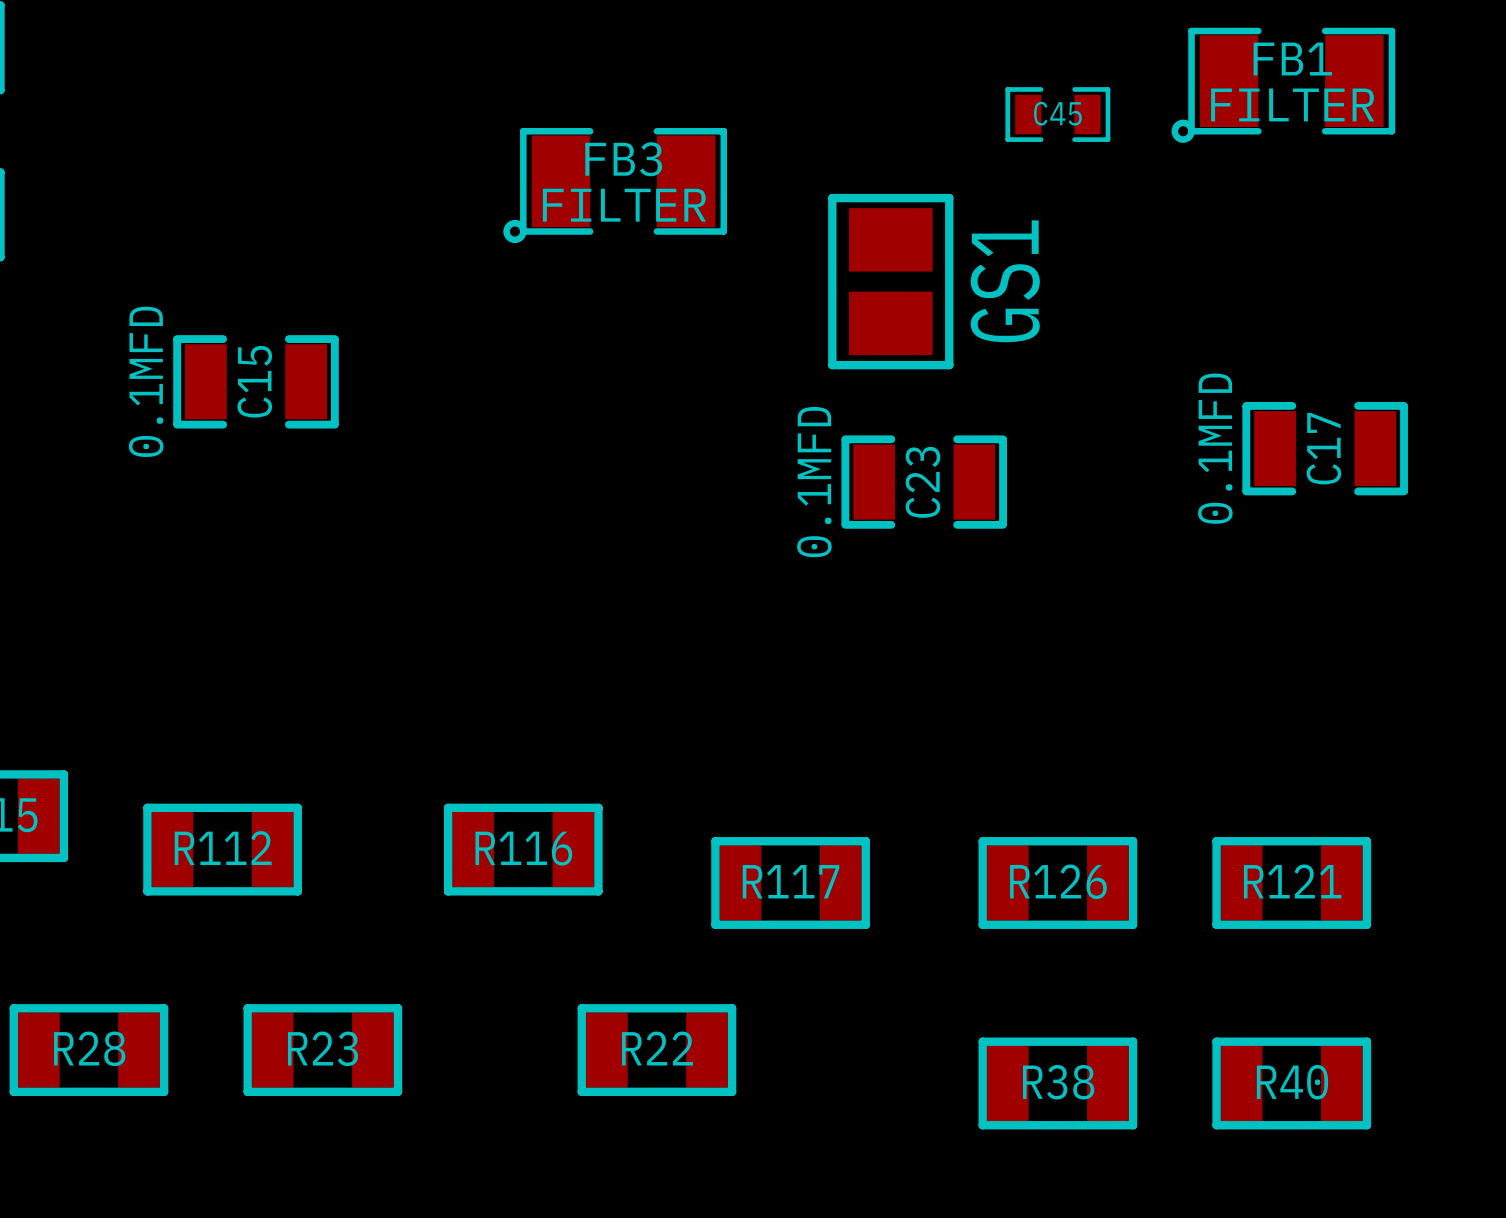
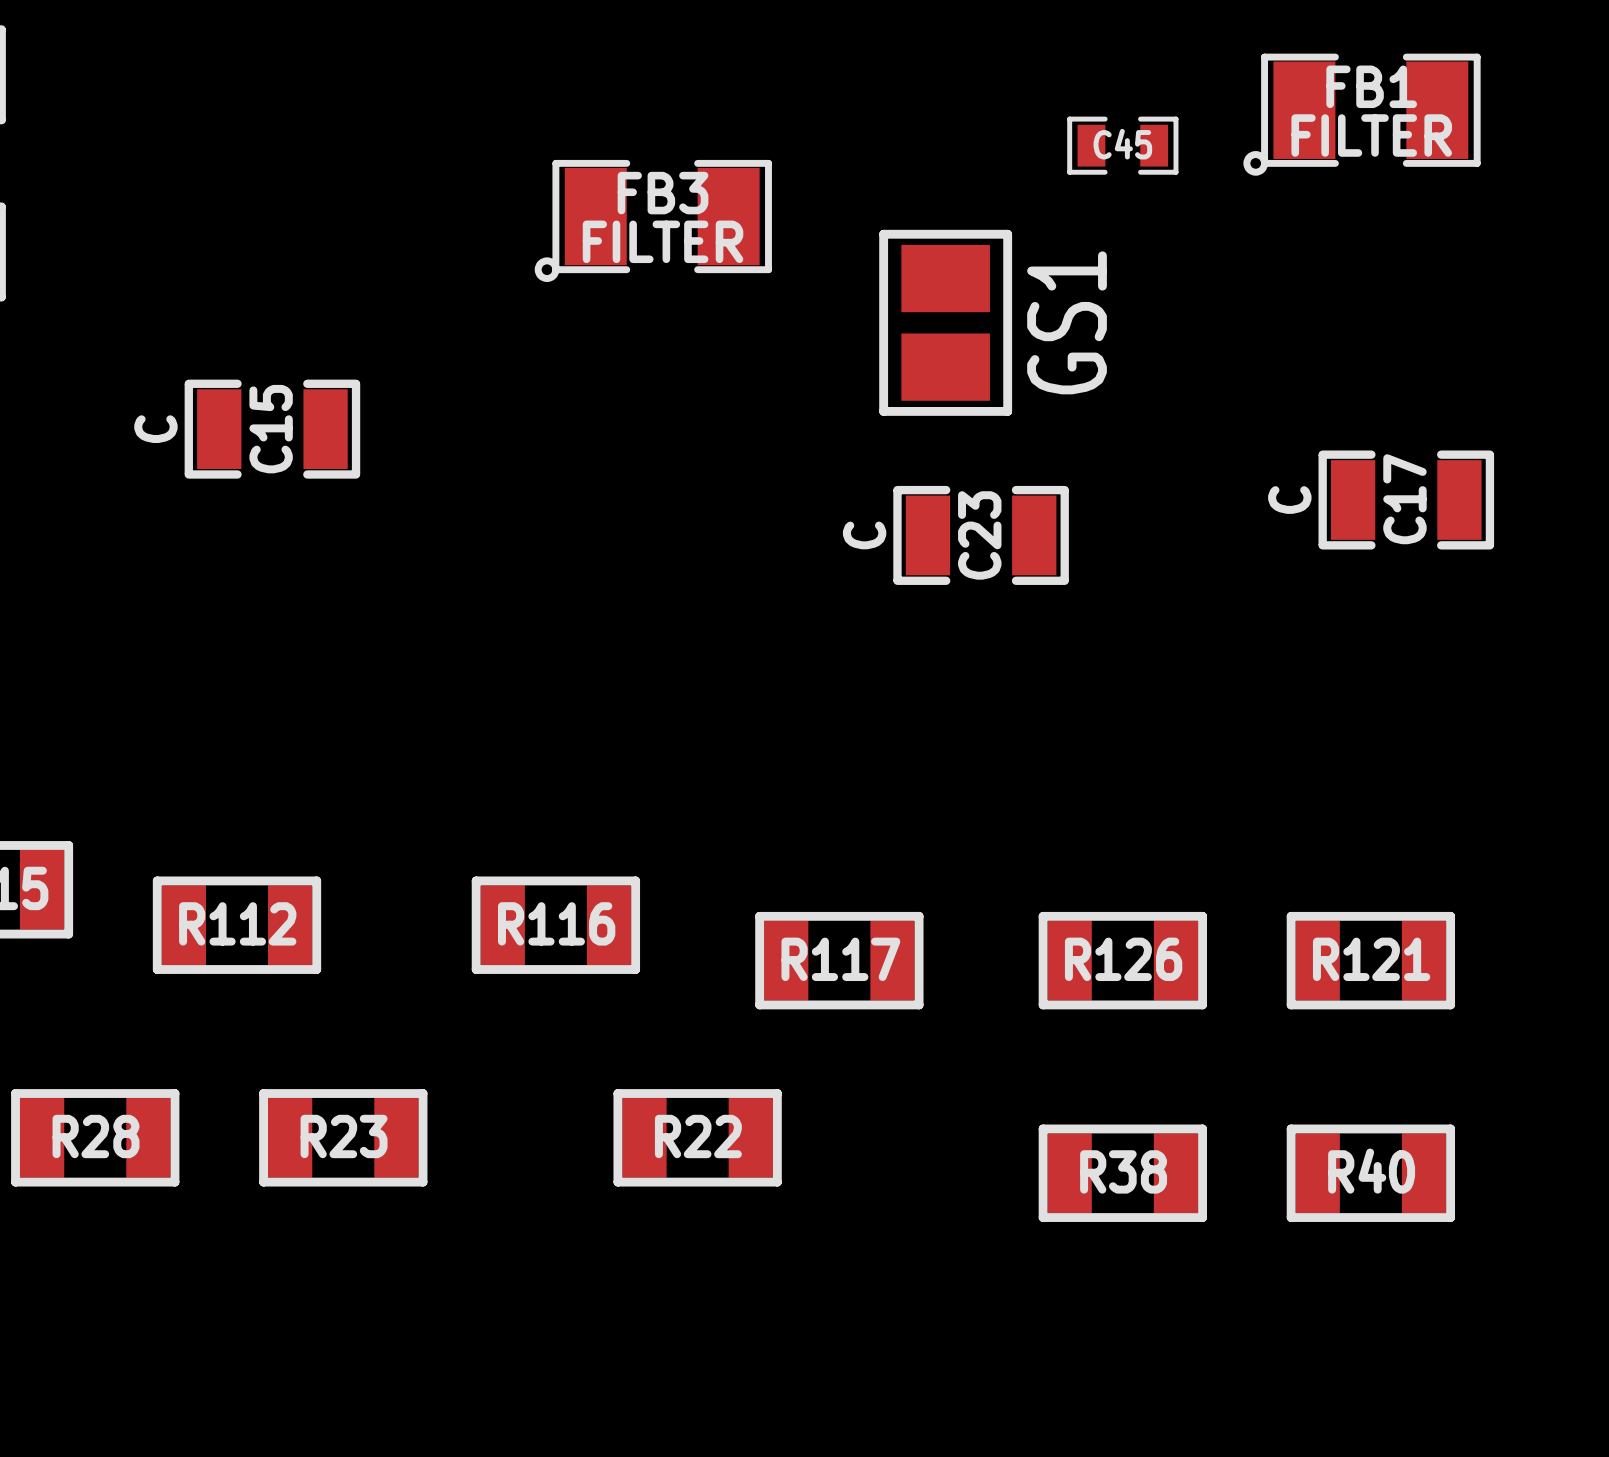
C15 value: 0.1MFD (146, 381) -> C (155, 429)
C17 value: 0.1MFD (1215, 448) -> C (1289, 500)
C23 value: 0.1MFD (814, 482) -> C (864, 535)

